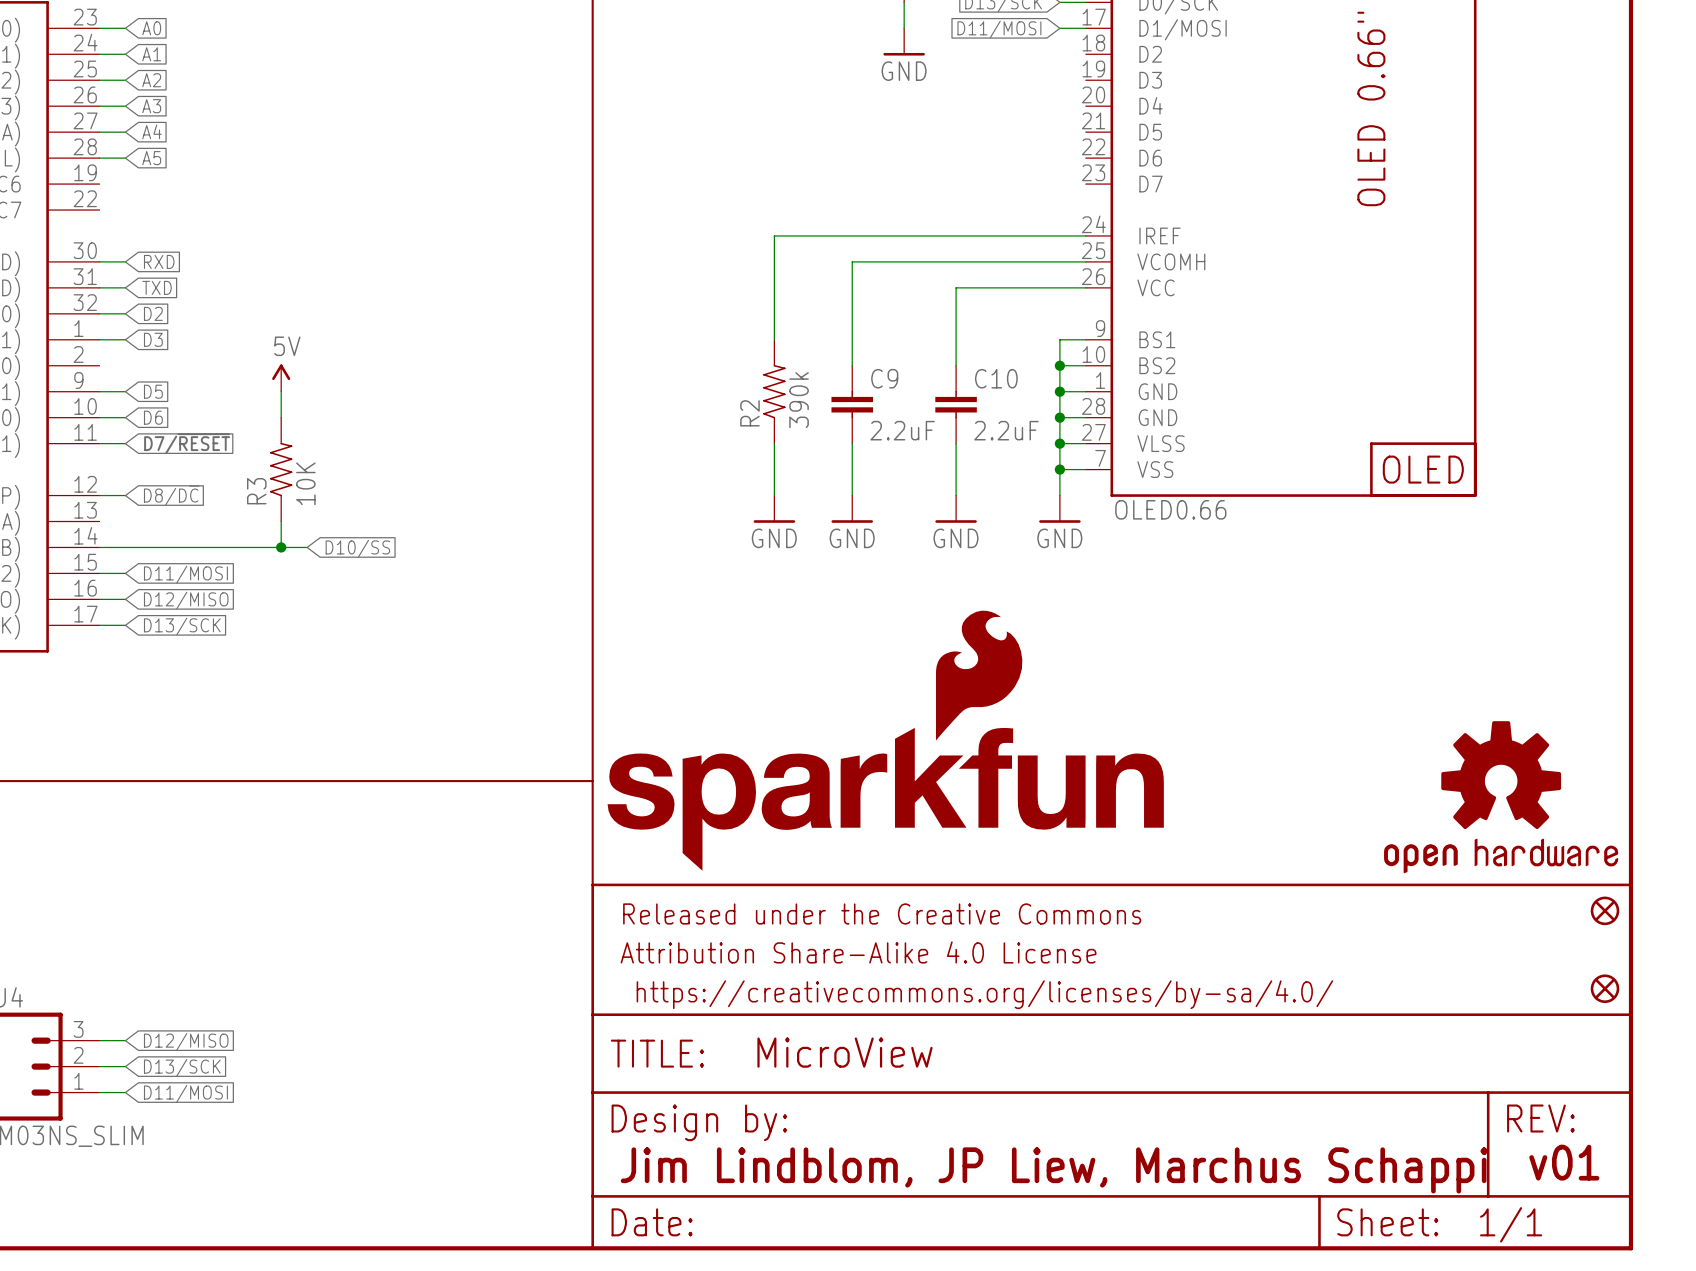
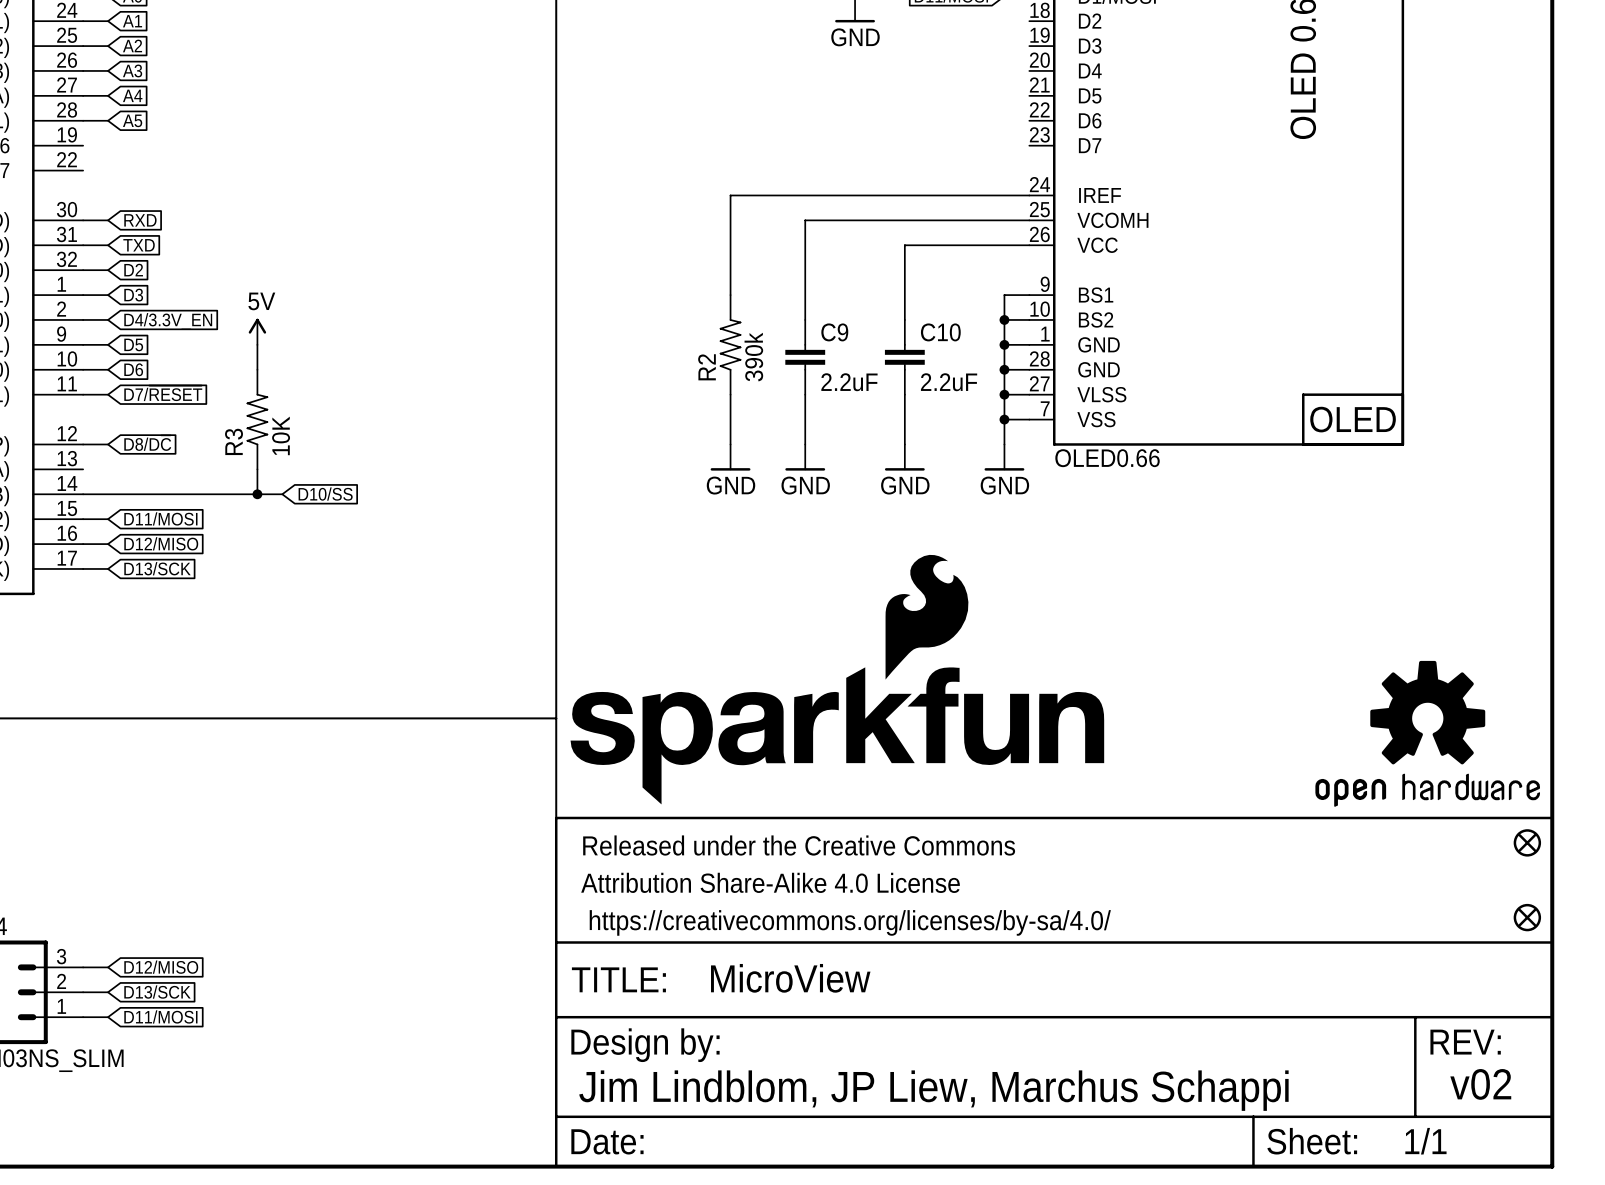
wire: none -> (83, 319) (108, 319)
global label: none -> D4/3.3V_EN (168, 321)
text: v01 (1564, 1162) -> v02 (1480, 1084)

